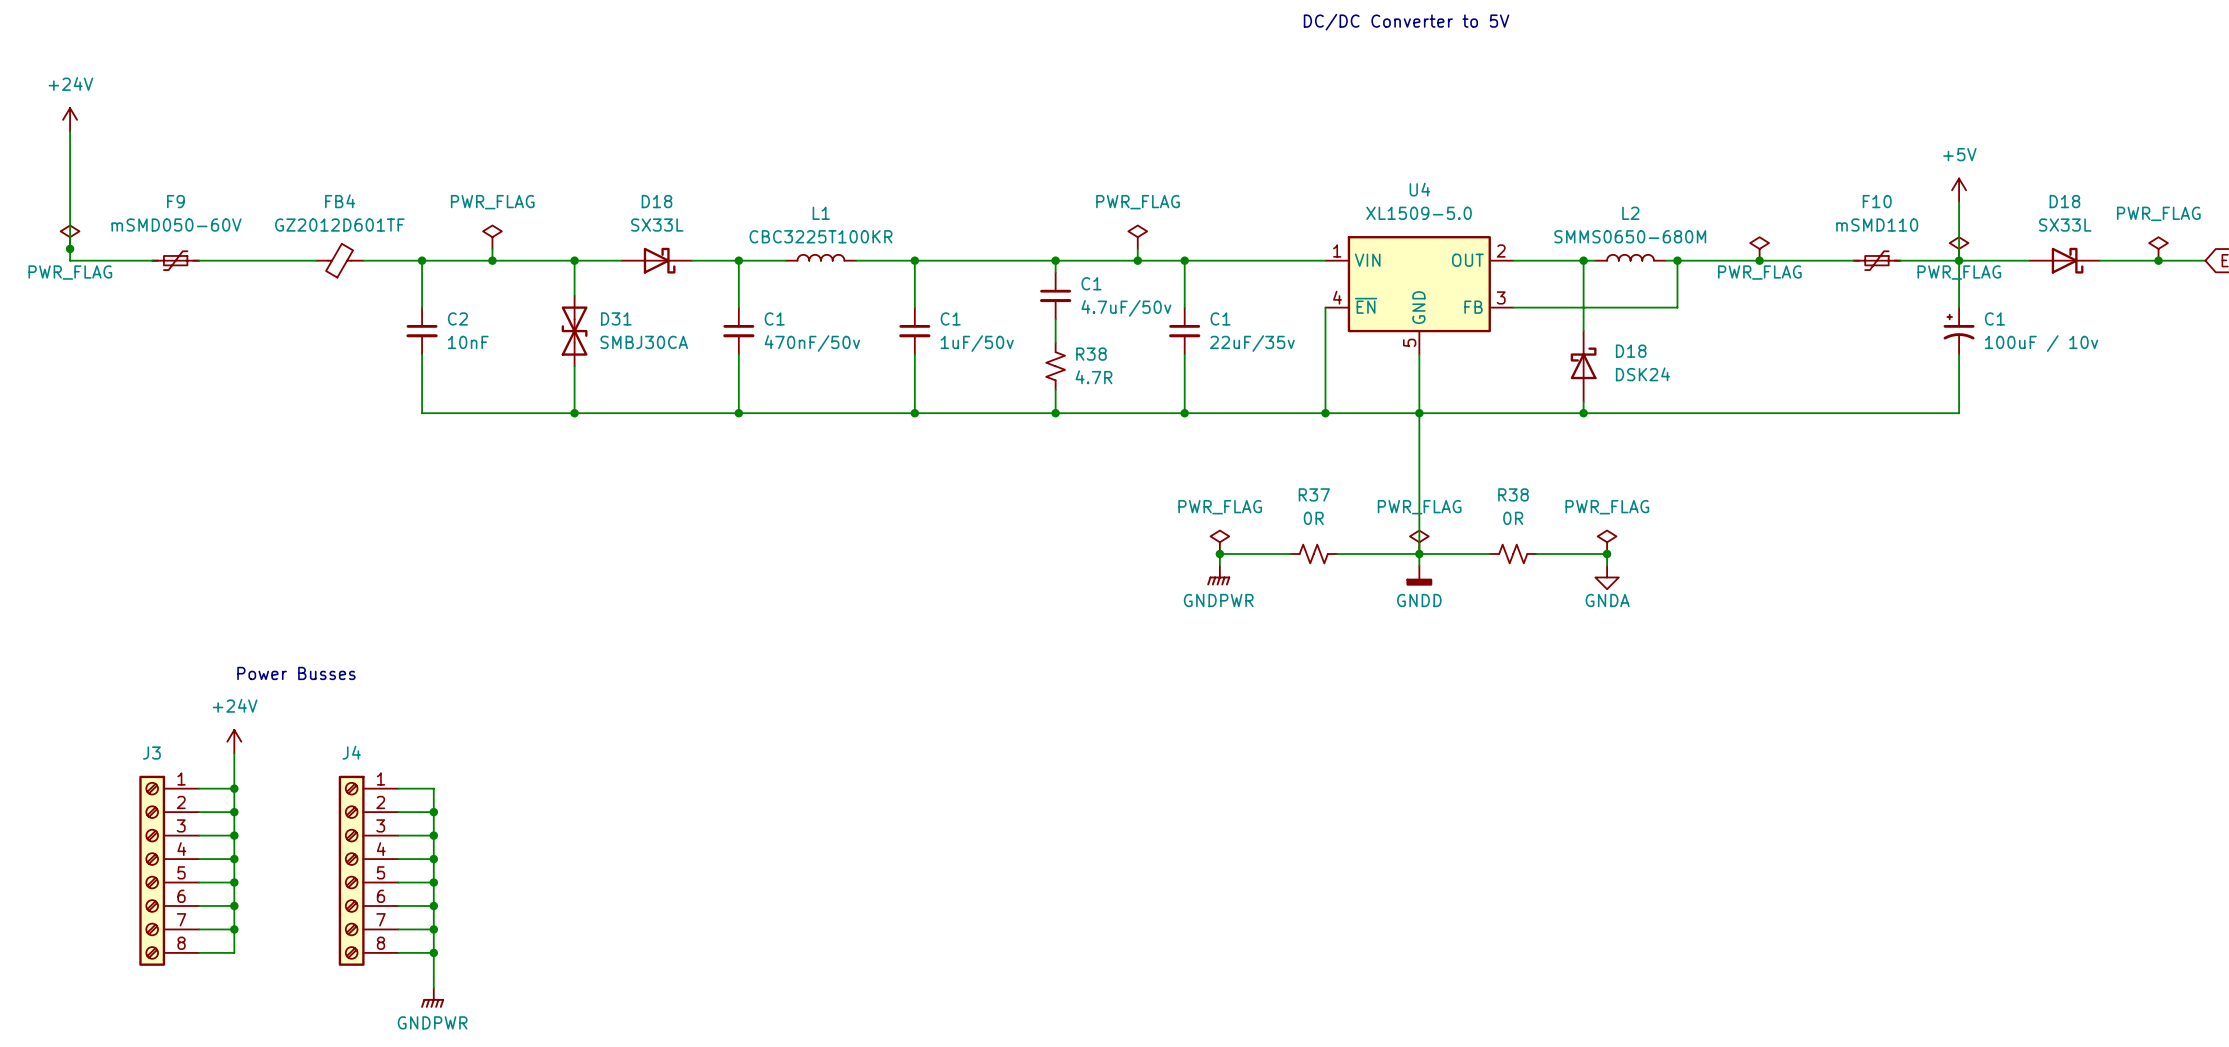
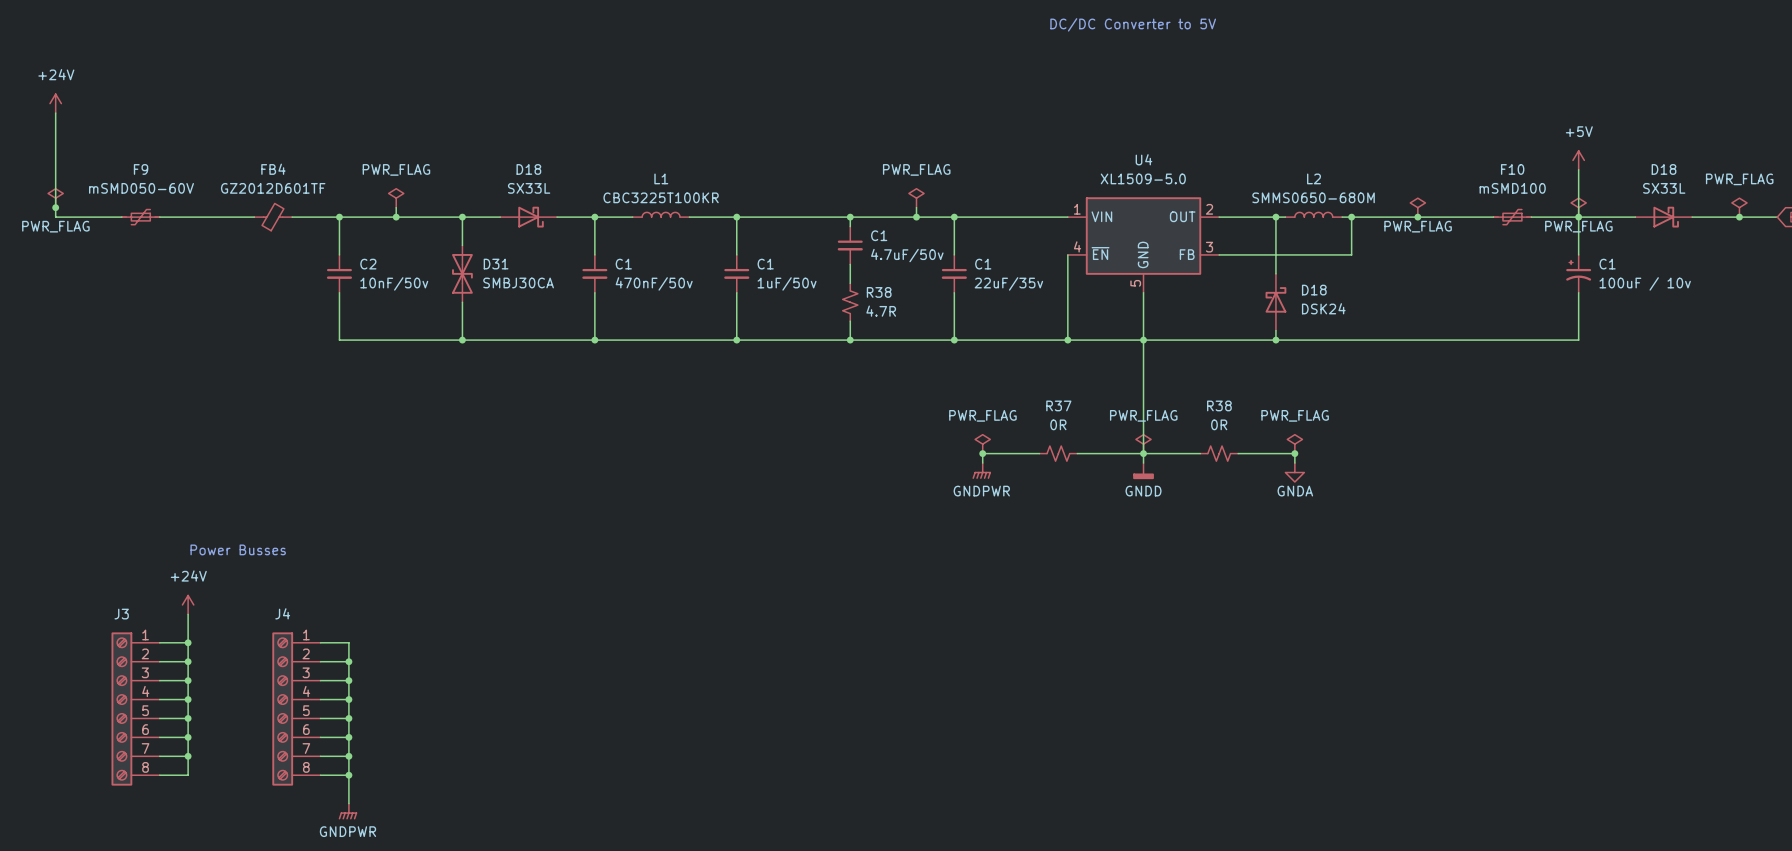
F10 value: mSMD110 (1877, 225) -> mSMD100 (1512, 188)
C2 value: 10nF (468, 342) -> 10nF/50v (394, 283)

